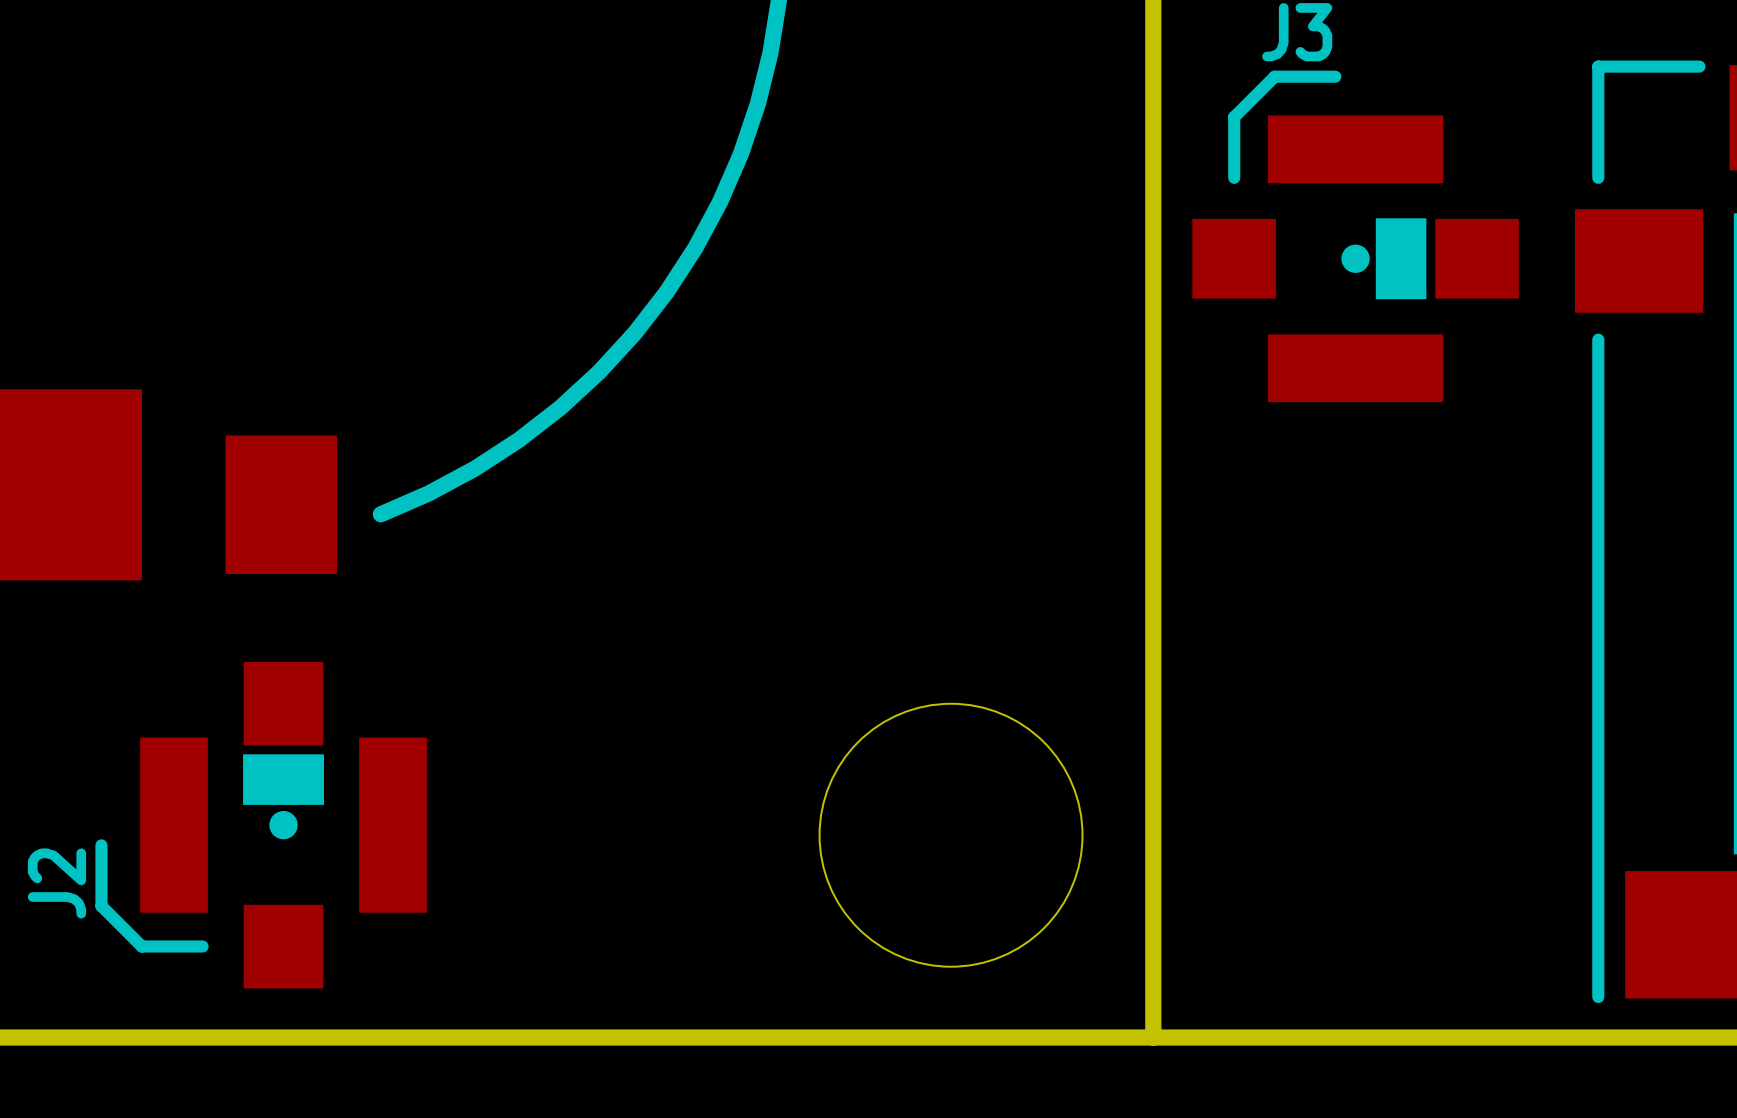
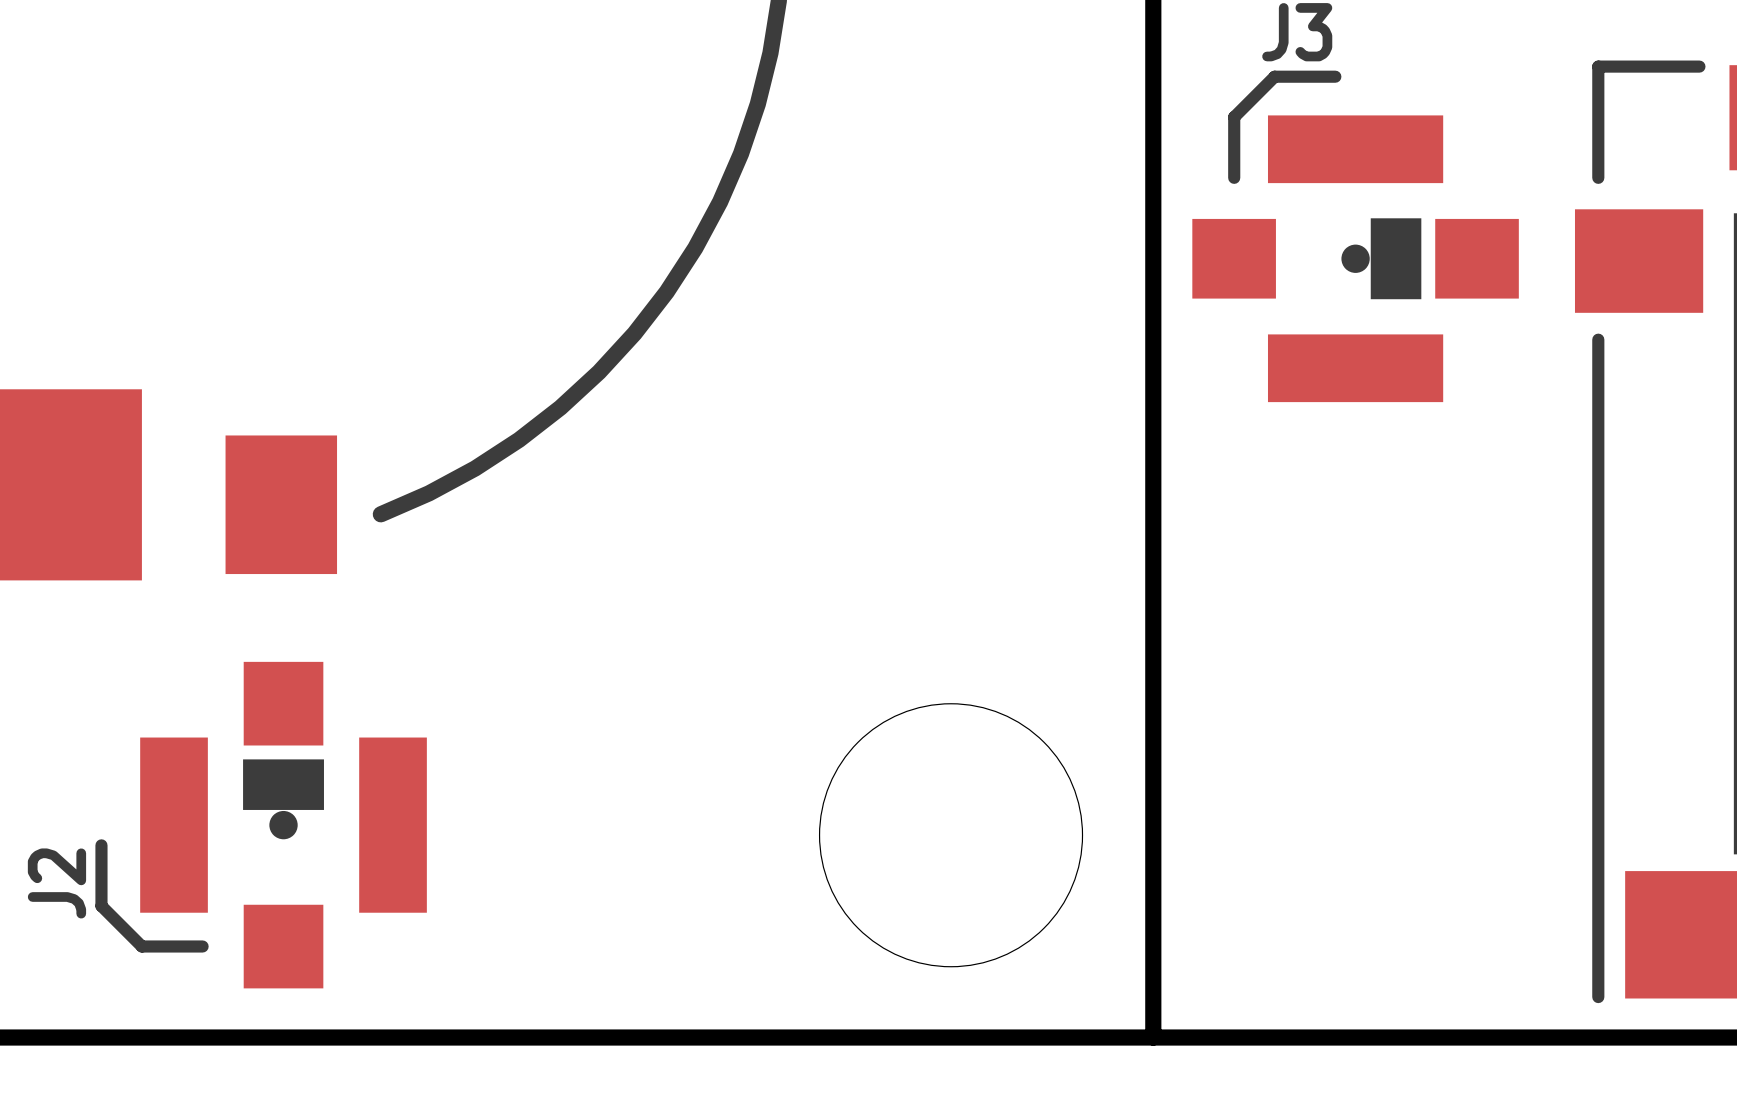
J3 footprint: [1192, 70, 1519, 403] -> [1192, 70, 1519, 403]
J2 footprint: [95, 661, 427, 989] -> [95, 661, 427, 989]

